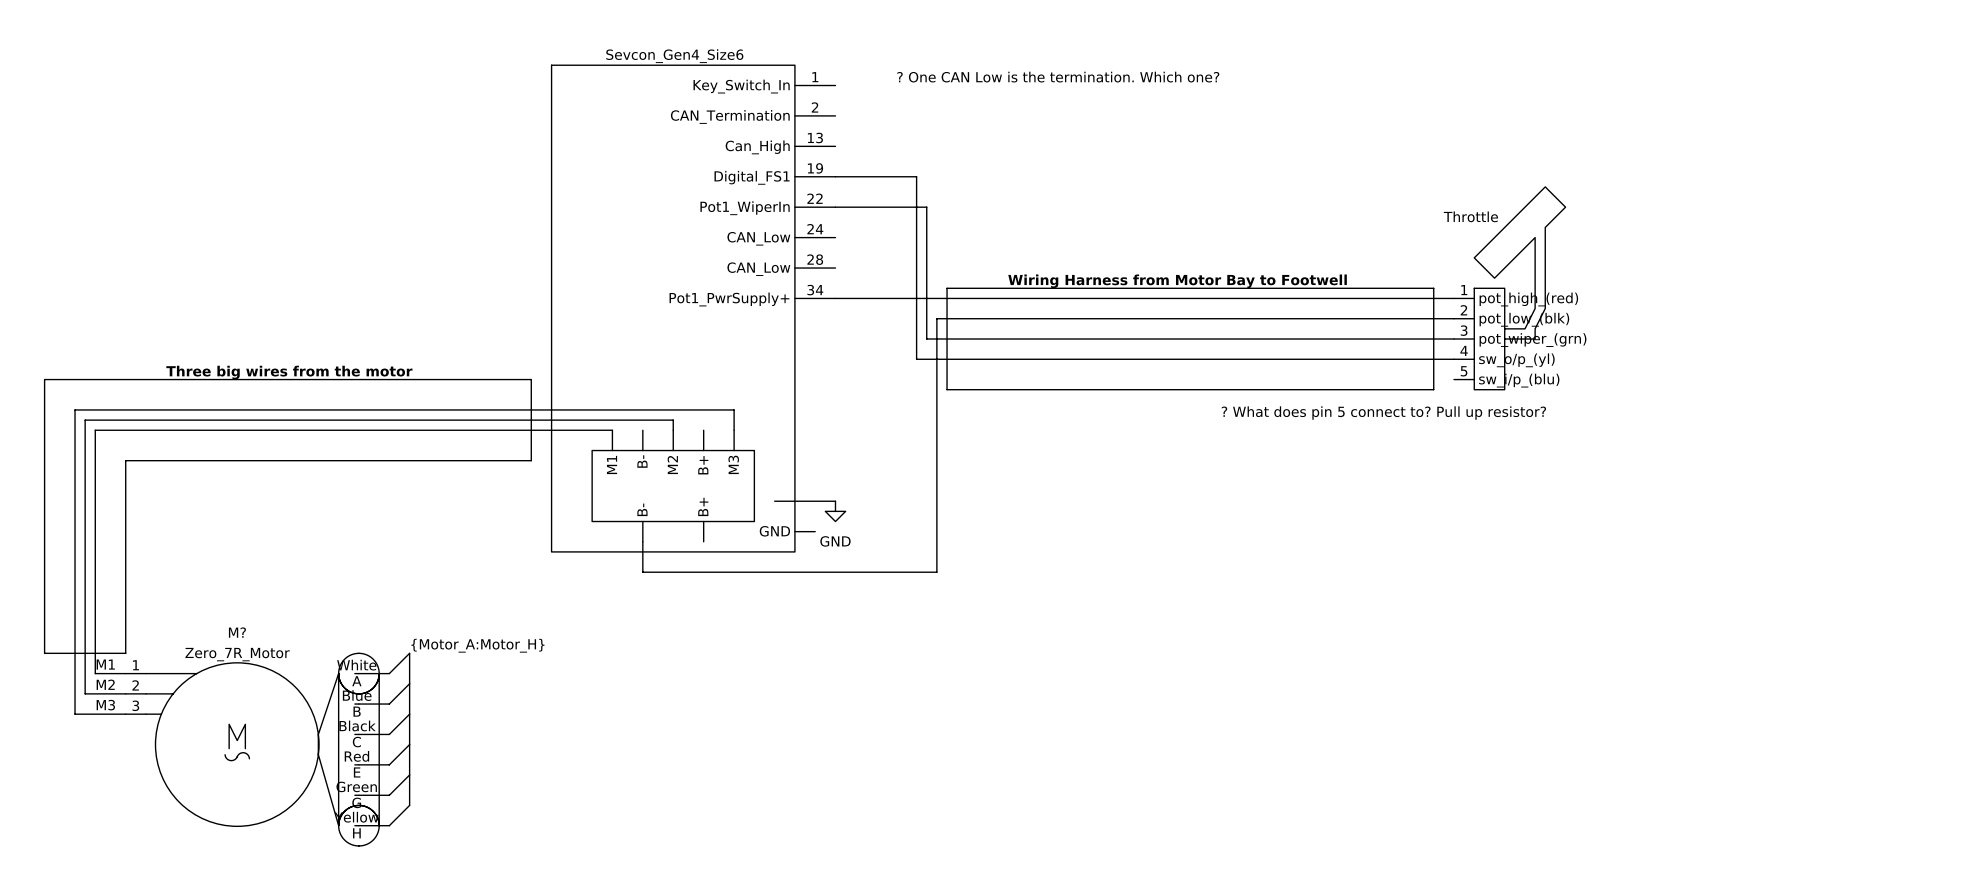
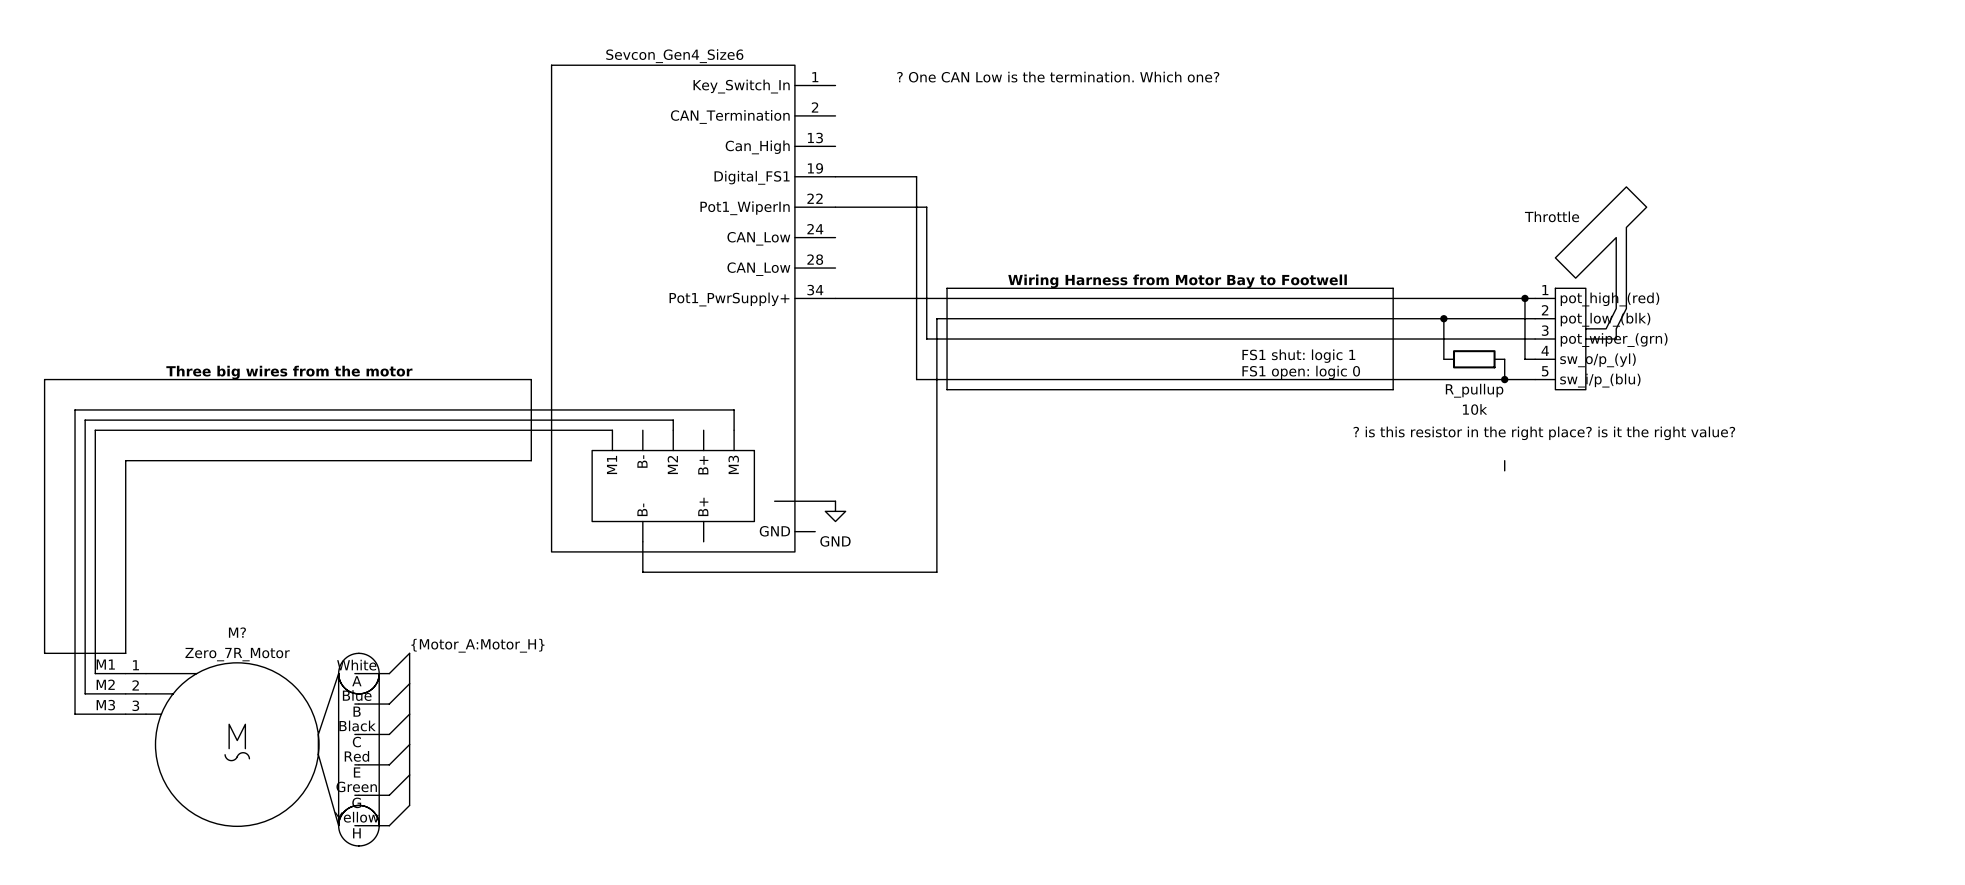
line: (1393, 288) (1433, 288) (1433, 389) (1393, 389) -> (1393, 288) (1393, 389)
part position: (1509, 288) -> (1590, 288)
wire: none -> (1454, 298) (1535, 298)
wire: none -> (1524, 298) (1524, 359) (1535, 359)
junction: none -> (1524, 298)
wire: none -> (1443, 318) (1443, 359)
junction: none -> (1443, 318)
wire: none -> (1454, 318) (1535, 318)
text: none -> FS1 shut: logic 1 (1298, 356)
wire: (916, 359) (1454, 359) -> (916, 359) (916, 379) (1535, 379)
R_pullup: none -> 10k (1474, 359)
text: none -> FS1 open: logic 0 (1301, 372)
junction: none -> (1504, 379)
text: ? What does pin 5 connect to? Pull up resistor? (1383, 413) -> none
text: none -> ? is this resistor in the right place? is it the right value? (1544, 433)
wire: none -> (1504, 460) (1504, 470)

